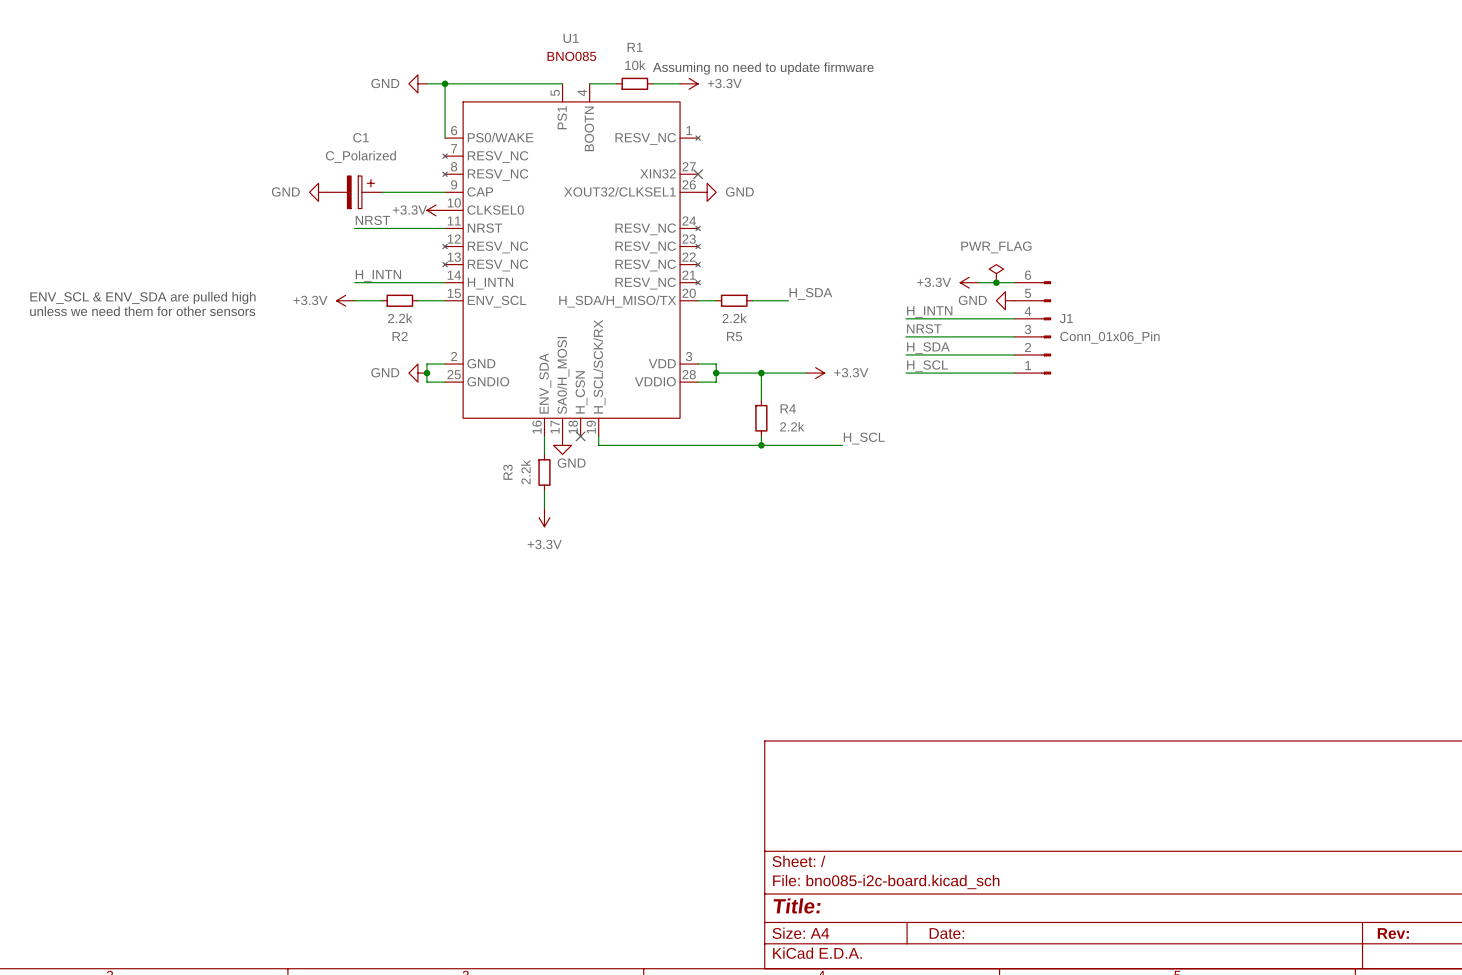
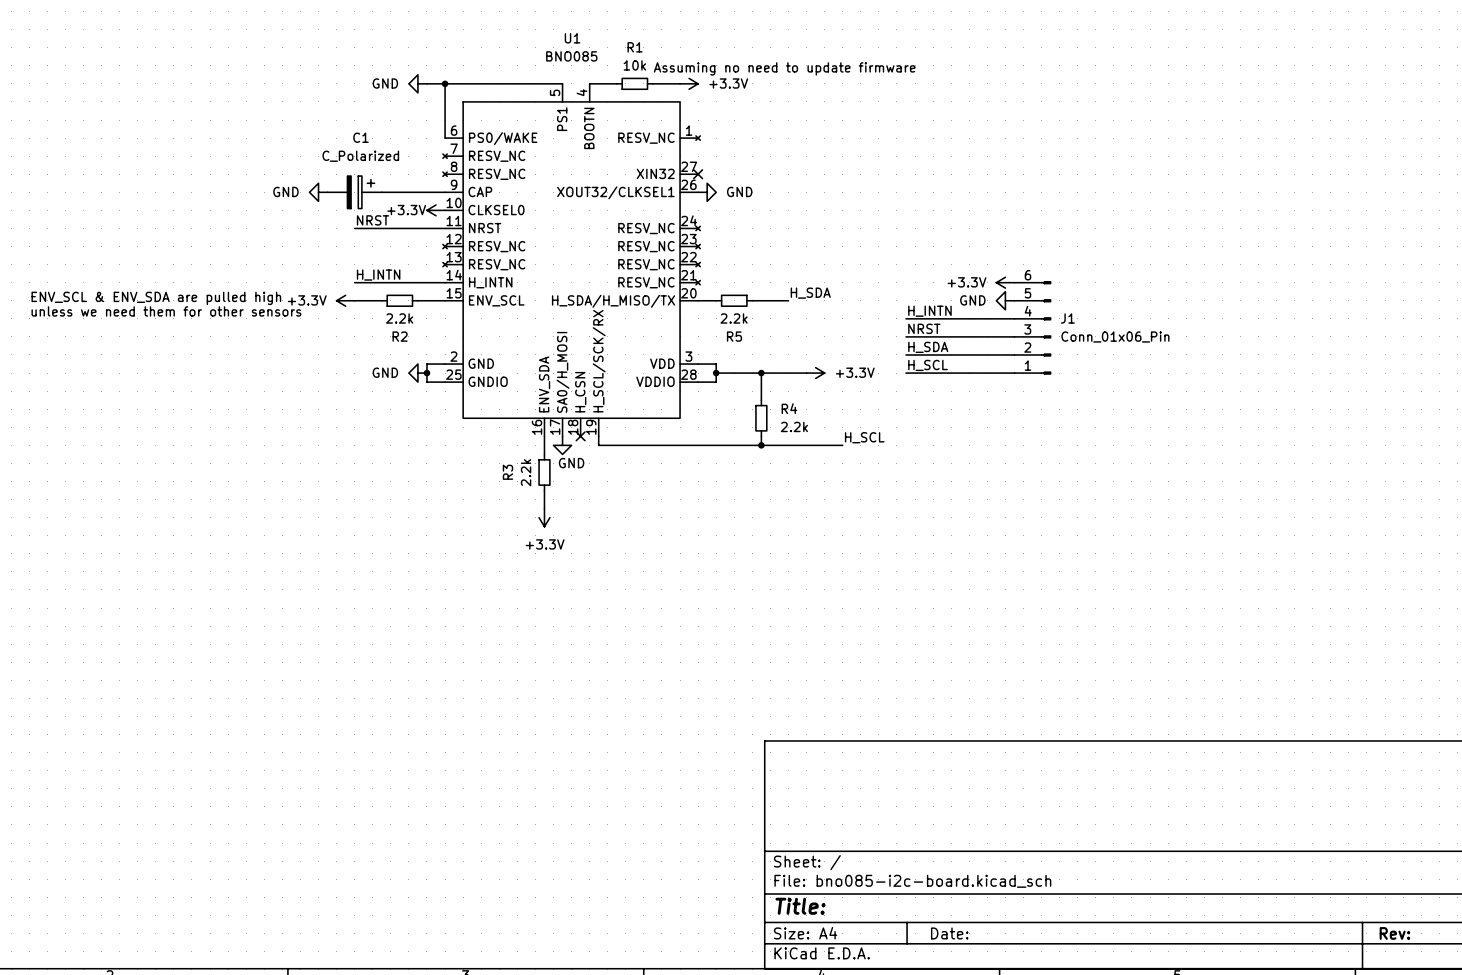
power symbol: PWR_FLAG (996, 273) -> none
power symbol position: +3.3V (969, 282) -> +3.3V (1005, 282)
junction: (996, 282) -> none

